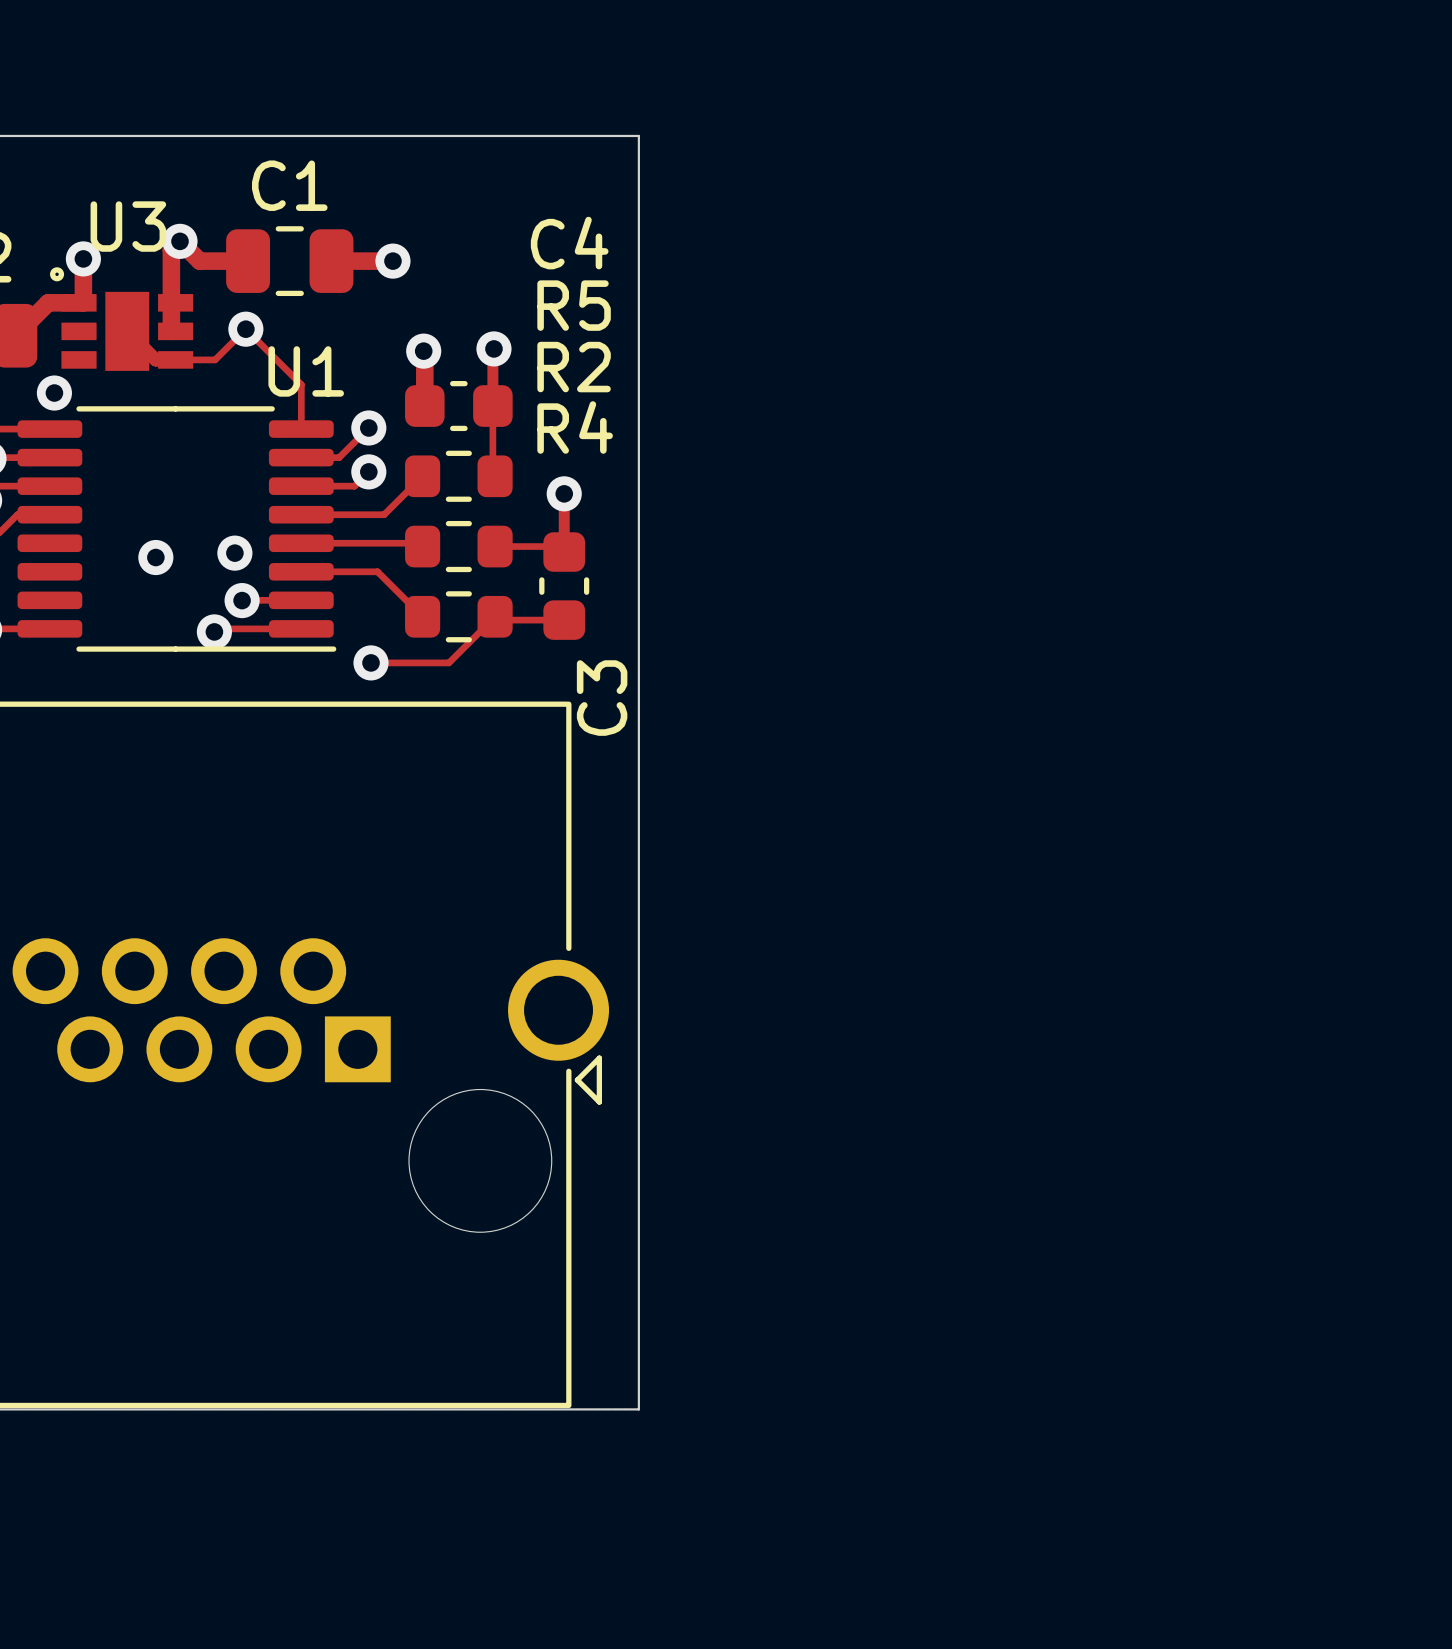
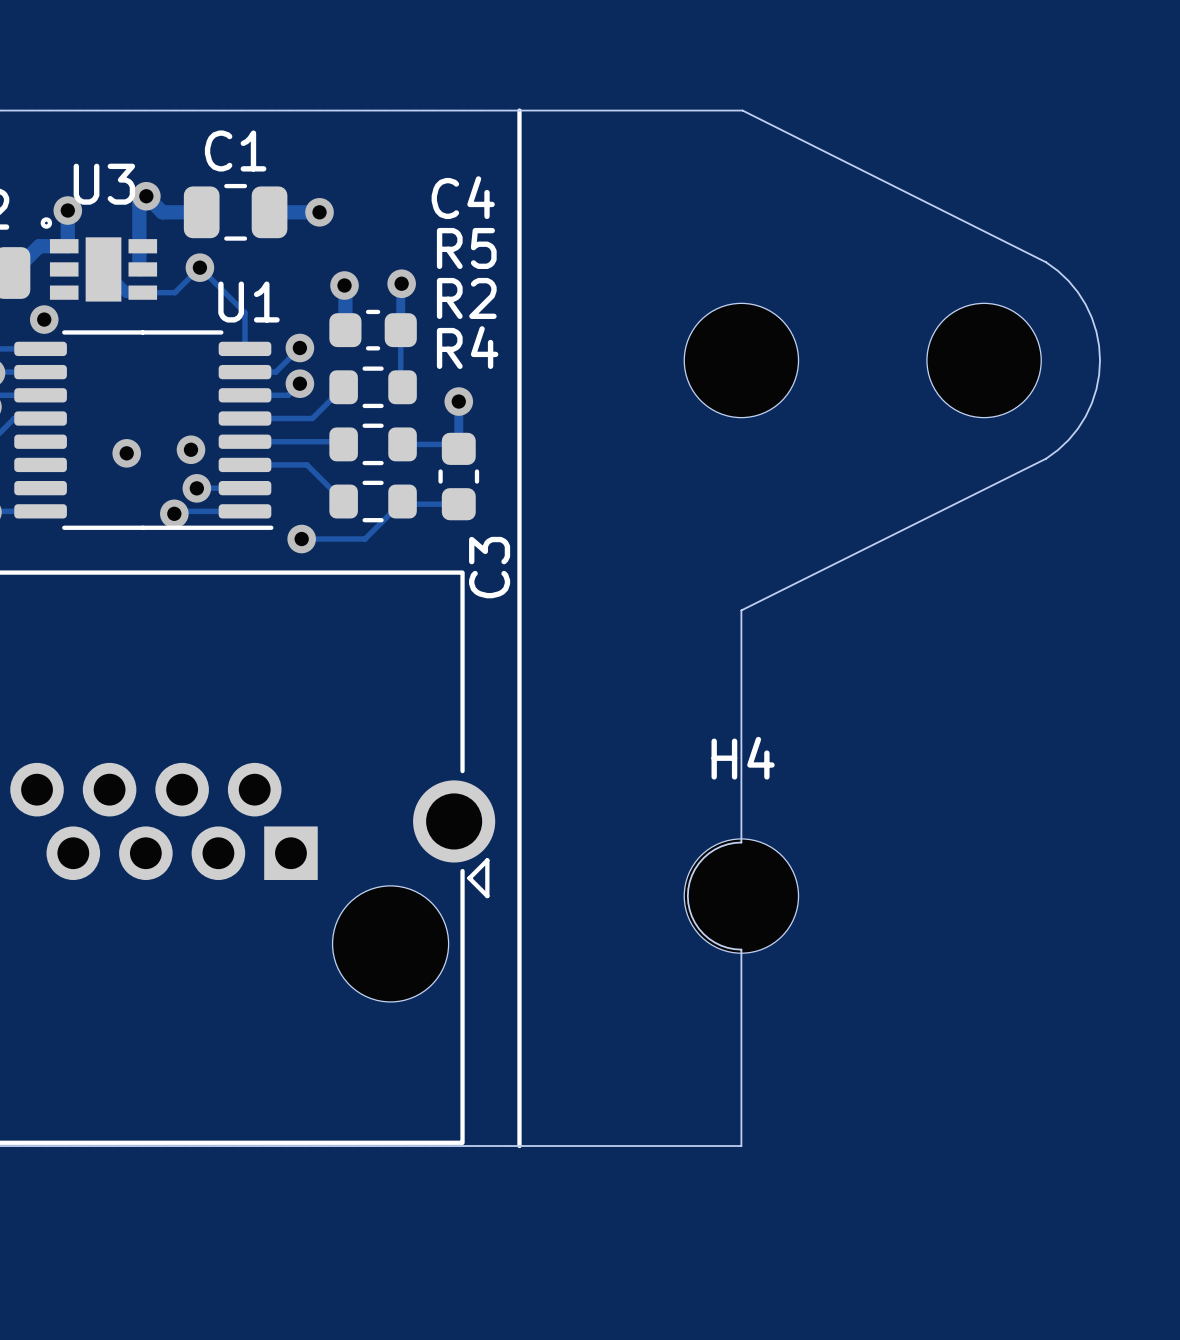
board edge: (638, 135) (638, 1409) -> (519, 110) (742, 110) (1046, 262) (1068, 280) (1085, 304) (1096, 331) (1100, 360) (1096, 389) (1085, 416) (1068, 440) (1046, 458) (741, 610) (741, 842) (720, 846) (703, 858) (691, 875) (687, 896) (691, 916) (703, 933) (720, 945) (741, 949) (741, 1146) (519, 1146)
line: none -> (519, 110) (519, 1146)
part: none -> (741, 360)
part: none -> (984, 360)
H4: none -> (741, 896)

